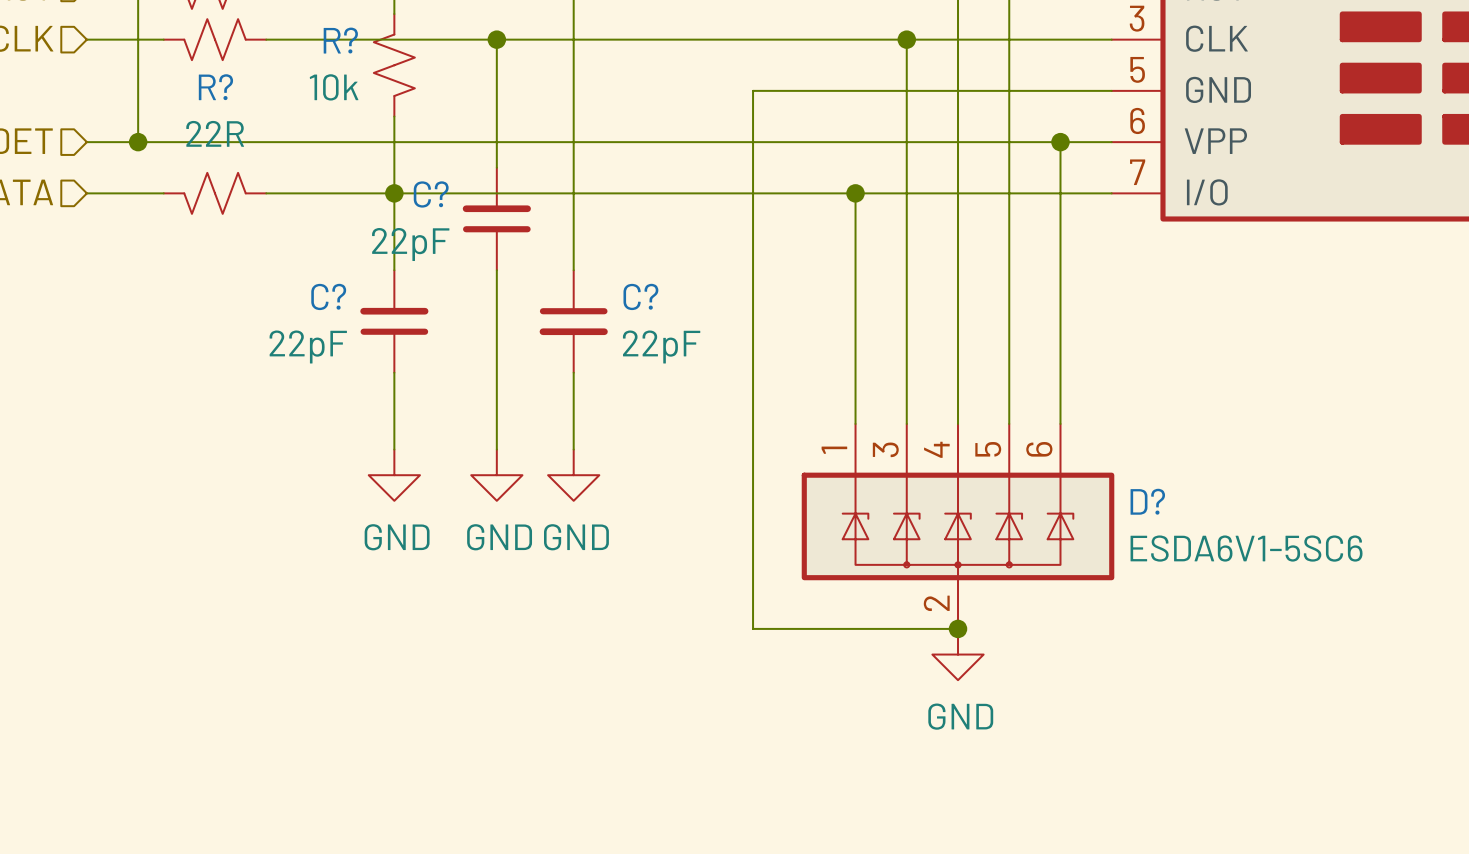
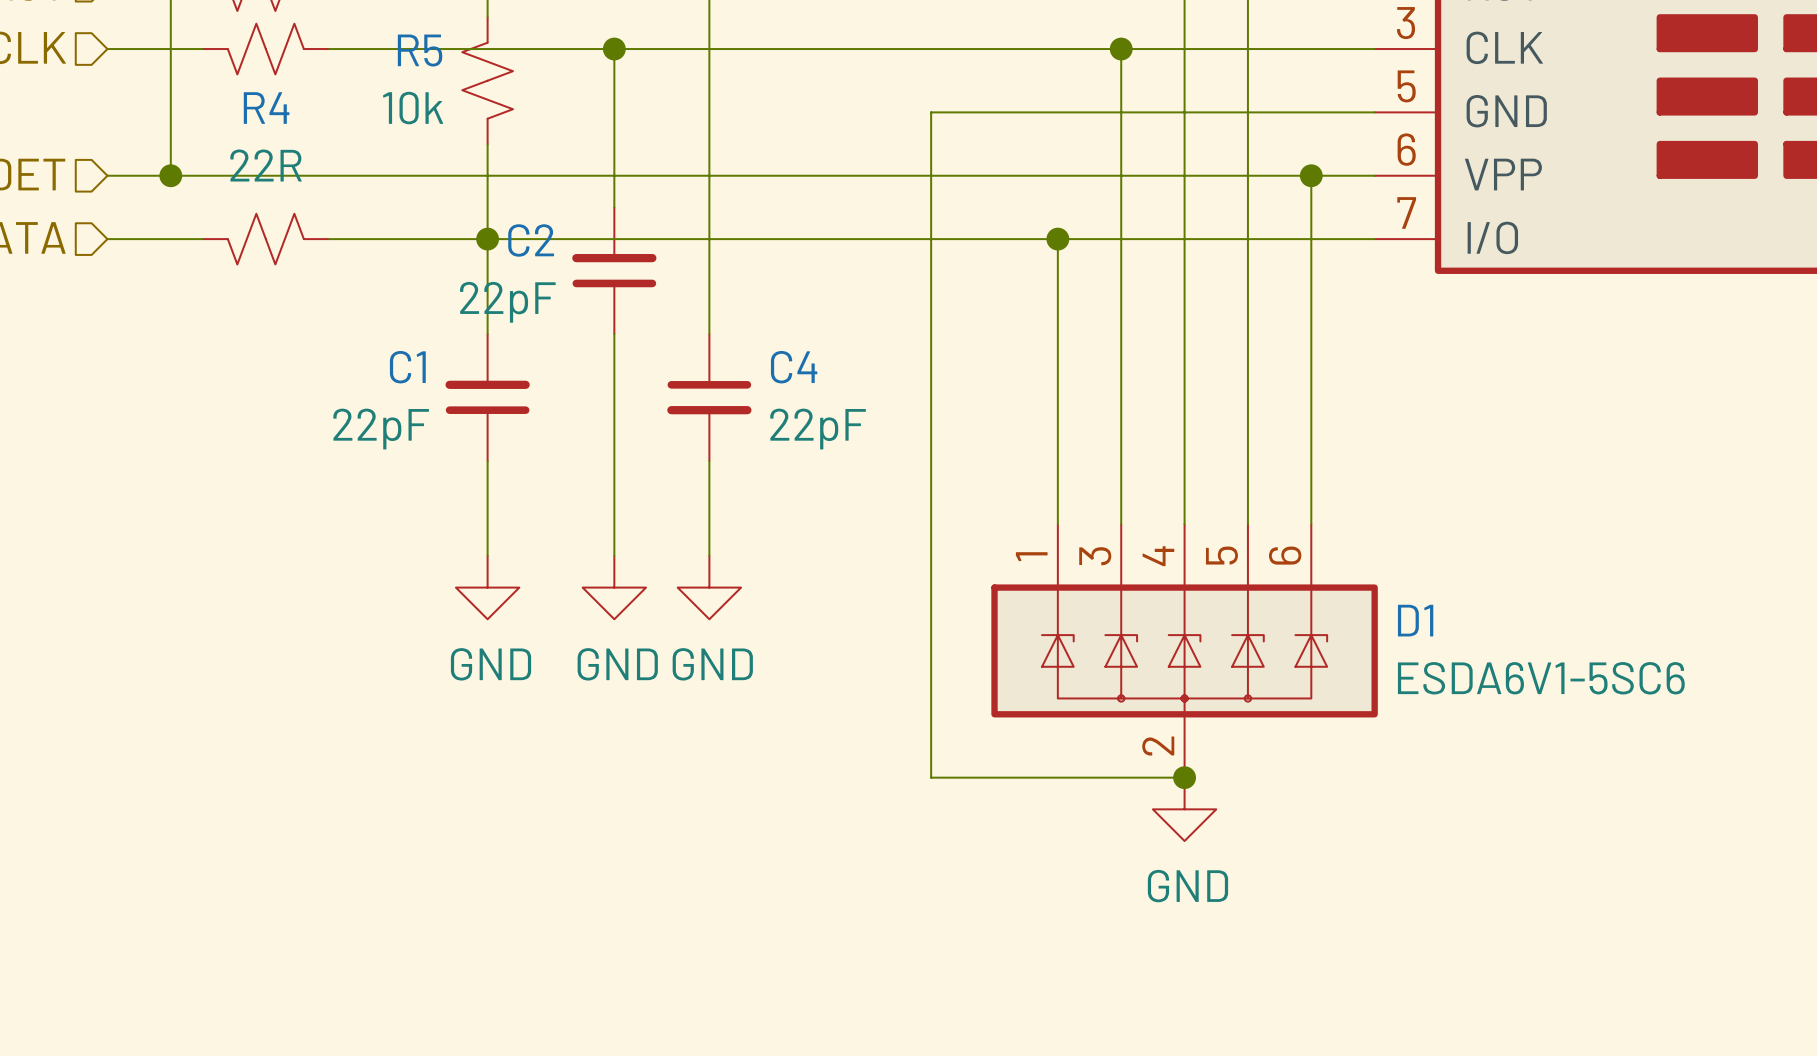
R? name: R? (340, 40) -> R5 (420, 50)
R? name: R? (215, 87) -> R4 (266, 108)
C? name: C? (431, 194) -> C2 (531, 240)
C? name: C? (328, 296) -> C1 (407, 367)
C? name: C? (640, 296) -> C4 (794, 367)
D? name: D? (1147, 501) -> D1 (1415, 620)

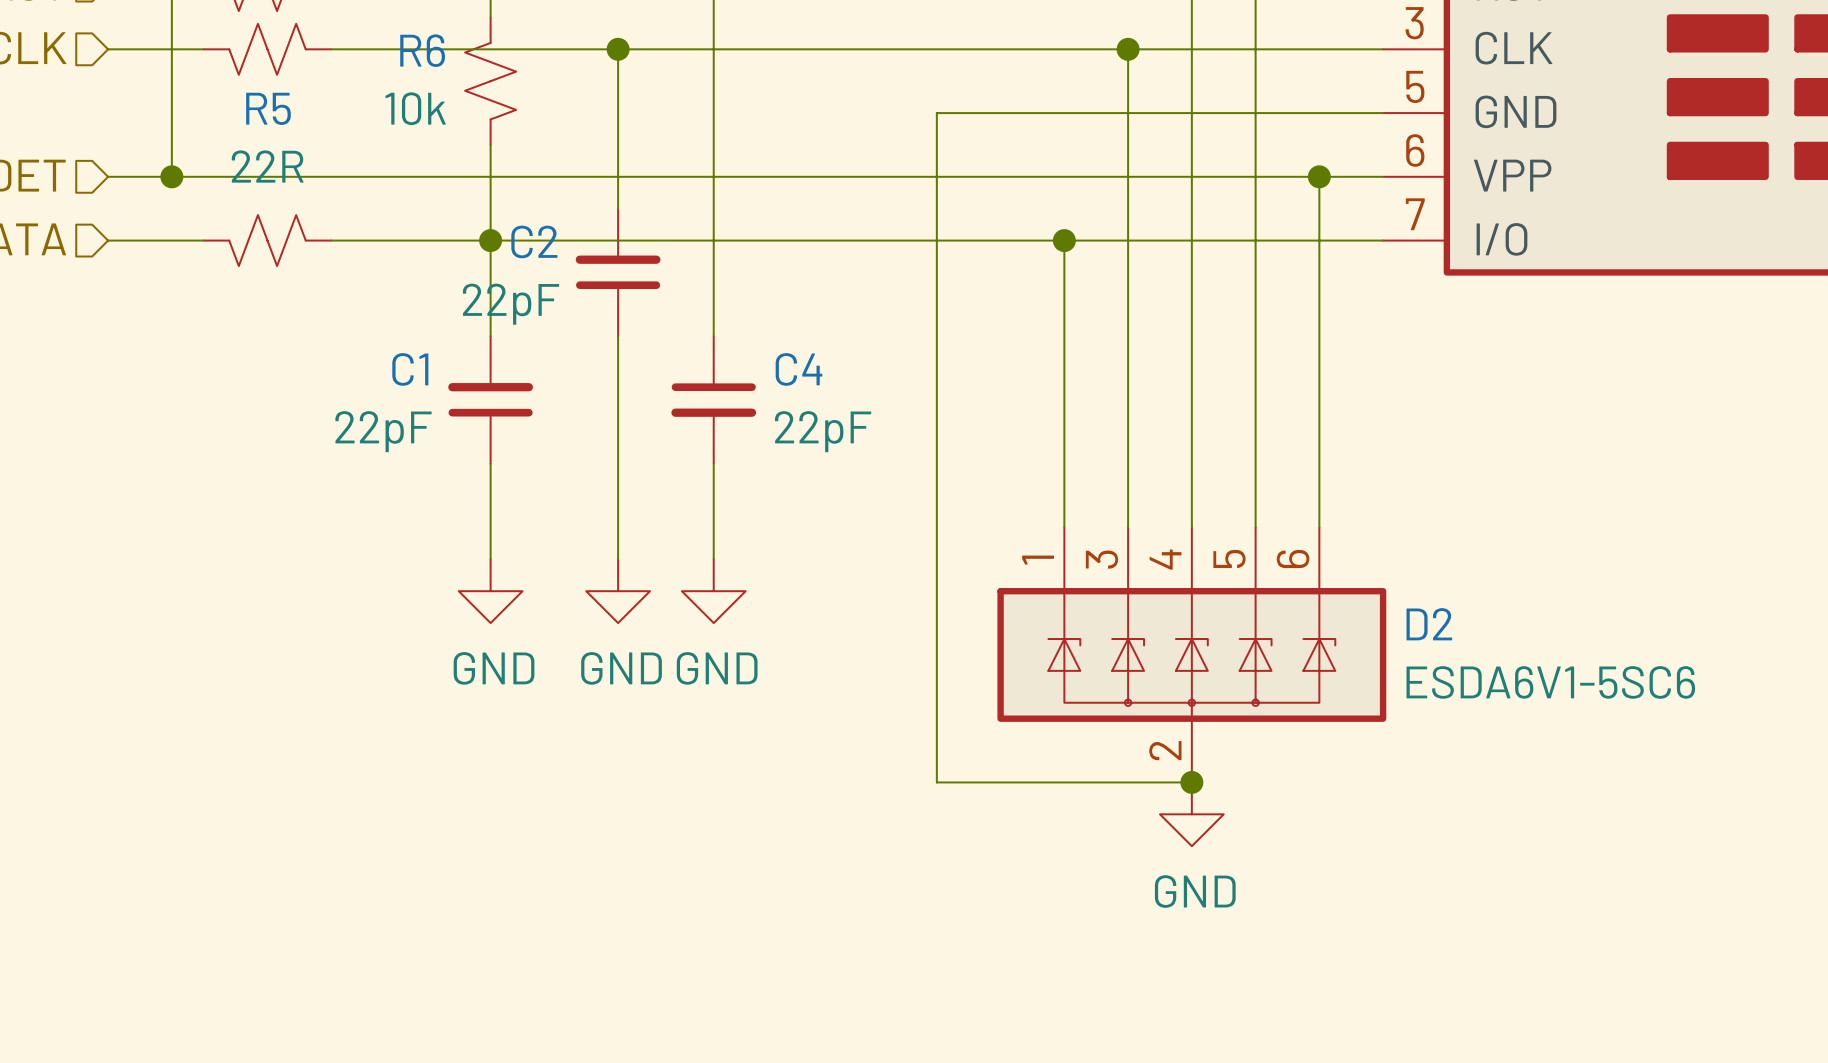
R5 name: R5 (420, 50) -> R6 (422, 50)
R4 name: R4 (266, 108) -> R5 (268, 108)
D1 name: D1 (1415, 620) -> D2 (1429, 624)

